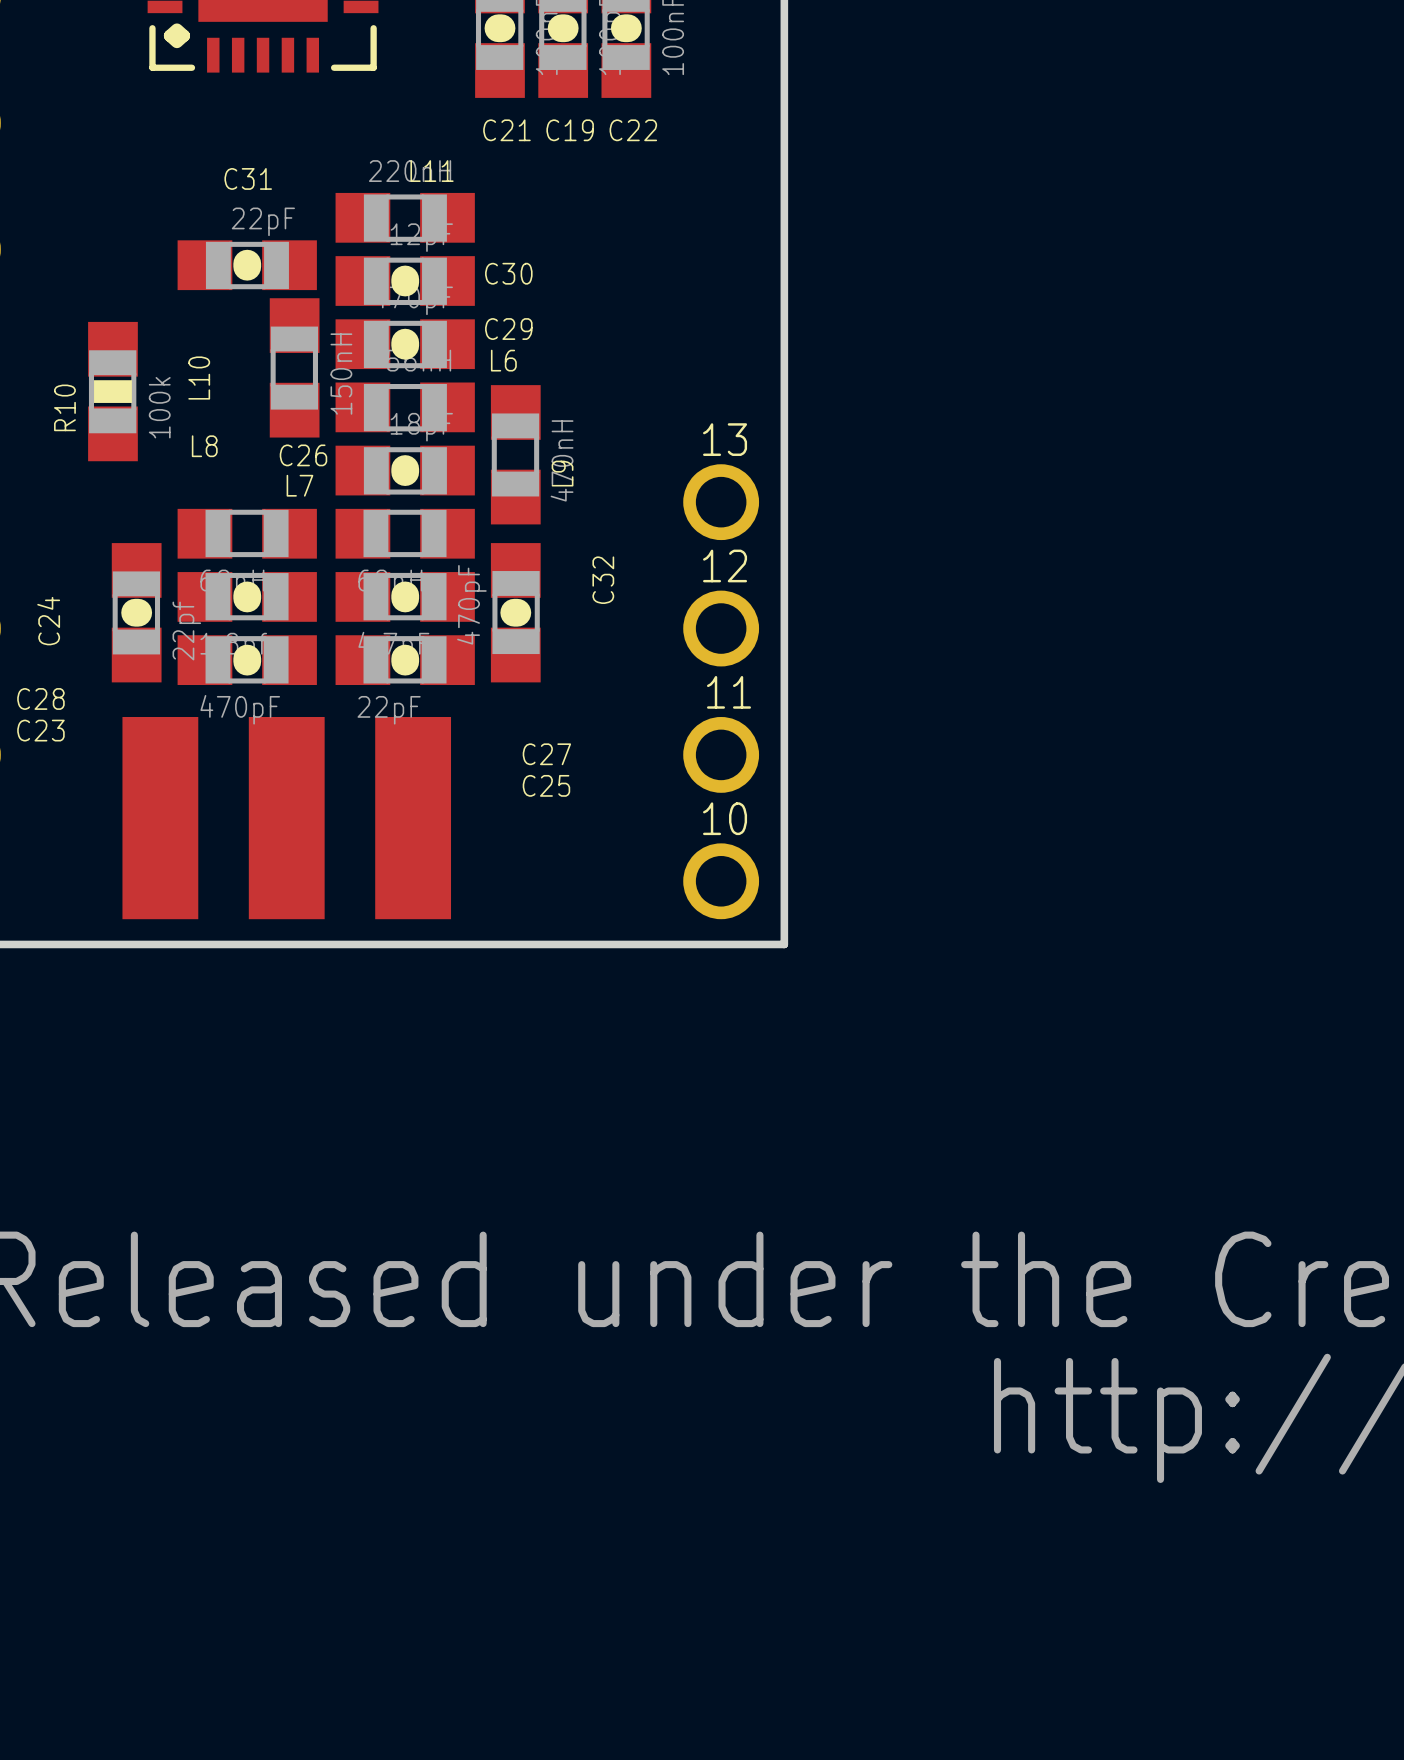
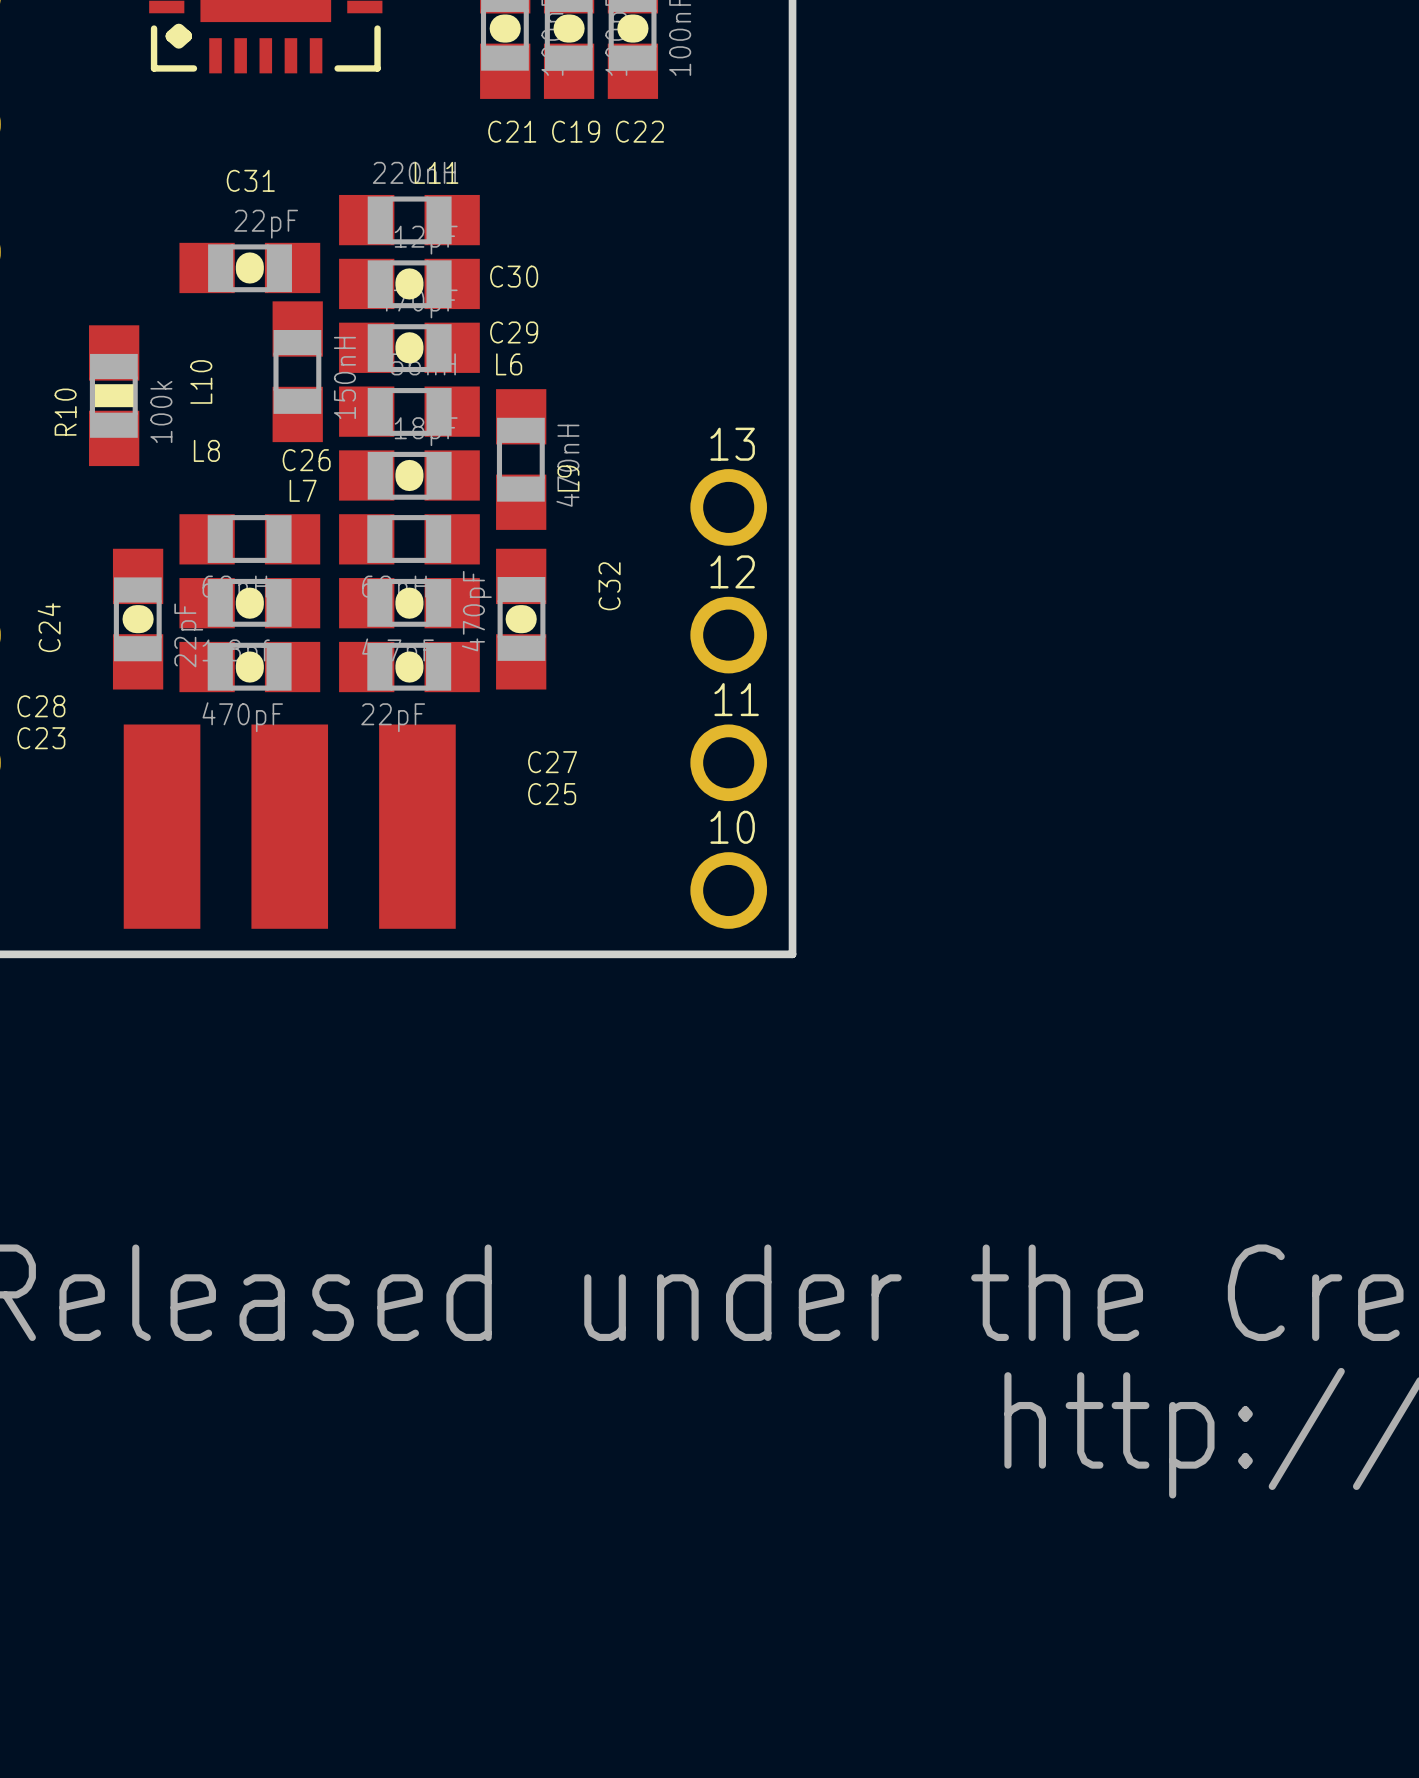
C24 value: 22pf (186, 631) -> 22pF (188, 635)

